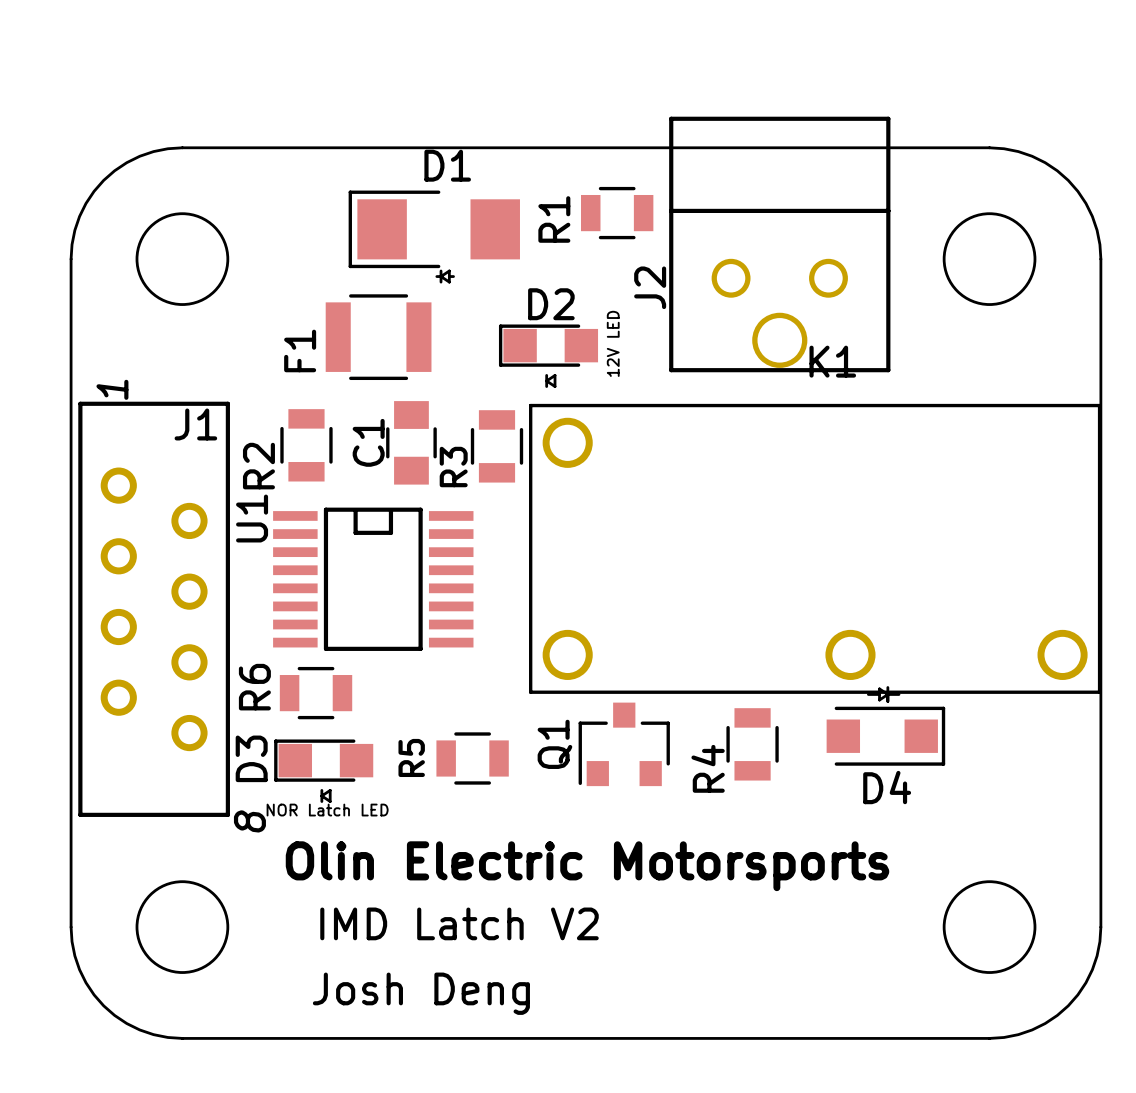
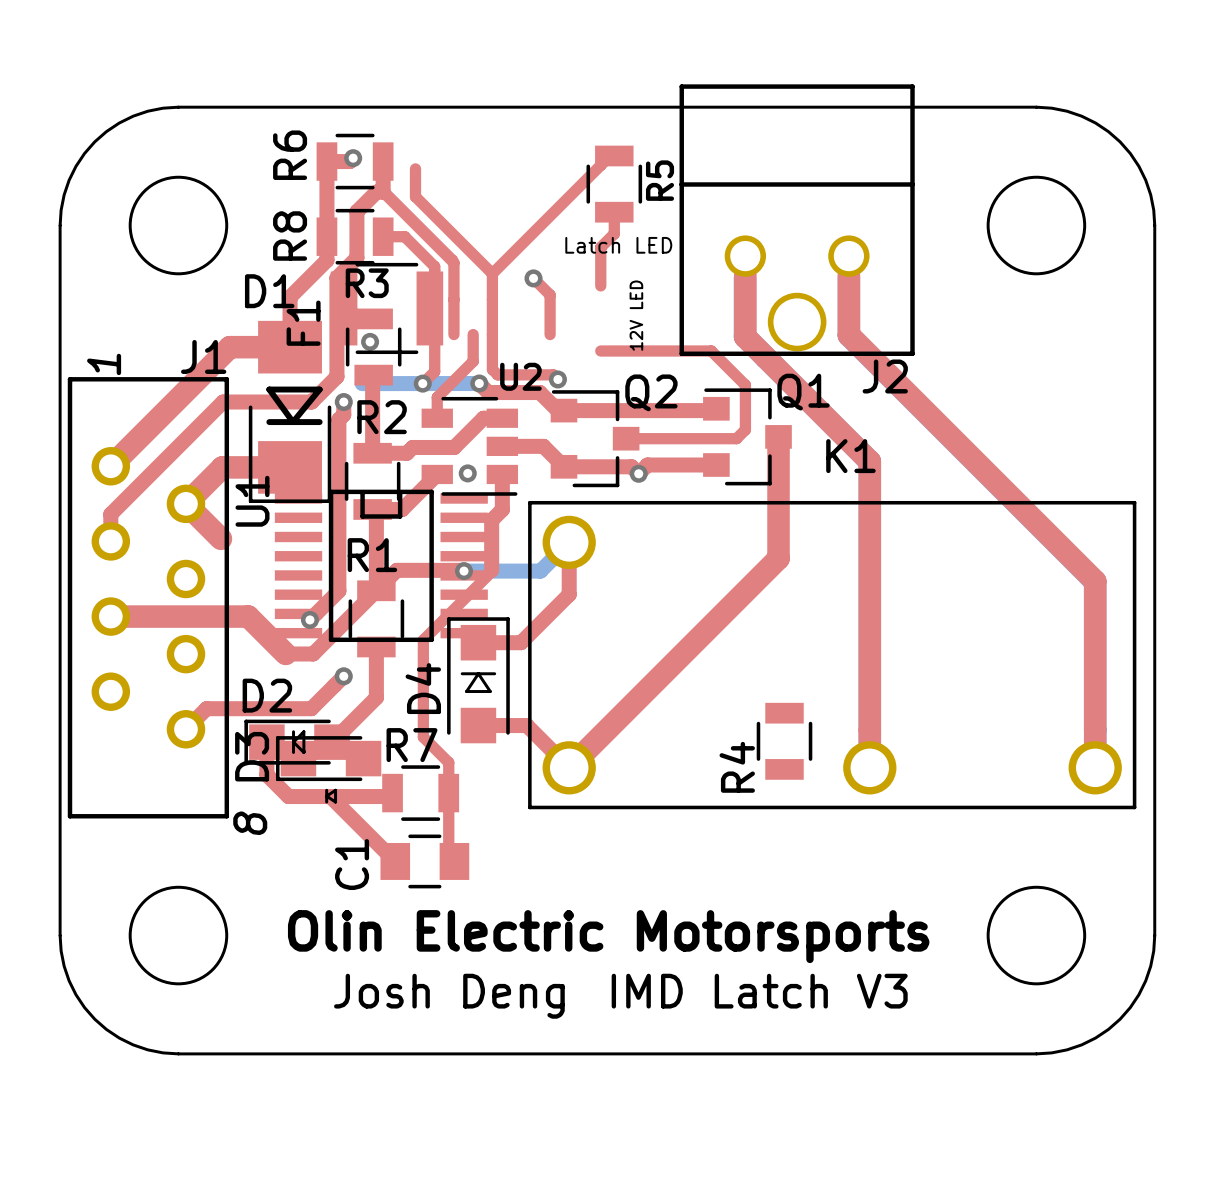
D1 footprint: [348, 190, 520, 284] -> [248, 320, 332, 503]
top track: none -> (612, 153) (492, 273)
top track: none -> (353, 158) (349, 161) (326, 161) (326, 260) (290, 297) (290, 347)
via: none -> (353, 158)
top track: none -> (415, 168) (415, 196) (492, 273)
R1 rotation: 0° (617, 213) -> 90° clockwise (376, 618)
R1 position: (617, 213) -> (376, 618)
top track: none -> (383, 192) (376, 192) (356, 211) (356, 257) (336, 277) (336, 376) (311, 402) (223, 402) (110, 514) (110, 541)
top track: none -> (383, 192) (383, 161) (383, 188) (453, 259) (453, 334) (453, 262) (383, 192)
J2 position: (779, 244) -> (797, 220)
top track: none -> (614, 212) (614, 233) (600, 247) (601, 285)
R8: none -> (355, 236)
top track: none -> (383, 236) (404, 236) (434, 266) (434, 371) (422, 383)
text: none -> Latch LED (618, 245)
J2 name rotation: 0° (650, 287) -> 90° clockwise (885, 376)
J2 name position: J2 (650, 287) -> J2 (885, 376)
top track: none -> (745, 256) (745, 337) (869, 461) (869, 767)
top track: none -> (848, 256) (848, 334) (1095, 581) (1095, 767)
top track: none -> (492, 273) (492, 369) (497, 374) (553, 374) (557, 379)
top track: none -> (533, 278) (550, 294) (550, 334)
via: none -> (533, 278)
D2 footprint: [498, 324, 599, 388] -> [244, 719, 350, 765]
top track: none -> (473, 334) (473, 361) (437, 397) (437, 418)
via: none -> (370, 341)
top track: none -> (290, 347) (229, 347) (110, 466)
top track: none -> (600, 351) (711, 351) (745, 385) (745, 429) (736, 438) (626, 438)
top track: none -> (373, 375) (372, 453) (406, 453) (412, 447) (454, 447) (483, 418) (502, 418)
via: none -> (557, 379)
bottom track: none -> (362, 383) (479, 383)
via: none -> (422, 383)
top track: none -> (479, 383) (488, 392) (539, 392) (557, 410) (714, 410) (716, 408)
via: none -> (479, 383)
J1 name position: J1 (195, 424) -> J1 (203, 356)
top track: none -> (343, 402) (343, 414) (338, 419) (338, 591) (309, 619)
via: none -> (343, 402)
C1 rotation: 0° (411, 442) -> 90° clockwise (424, 861)
C1 position: (411, 442) -> (424, 861)
R2 position: (306, 445) -> (372, 481)
R3 position: (497, 446) -> (373, 347)
top track: none -> (778, 436) (778, 558) (569, 767) (526, 725) (478, 725)
Q2: none -> (595, 438)
R2 name rotation: 0° (258, 466) -> 90° clockwise (382, 417)
R2 name position: R2 (258, 466) -> R2 (382, 417)
U2: none -> (469, 446)
top track: none -> (502, 446) (543, 446) (564, 466) (631, 466) (638, 473) (647, 464) (716, 464)
R3 name rotation: 0° (453, 467) -> 90° clockwise (367, 283)
R3 name position: R3 (453, 467) -> R3 (367, 283)
top track: none -> (290, 467) (222, 467) (185, 503) (220, 538)
via: none -> (467, 473)
via: none -> (638, 473)
top track: none -> (437, 474) (402, 509) (372, 509) (376, 513) (376, 590)
top track: none -> (502, 474) (502, 509) (491, 520) (491, 571) (423, 640) (423, 737) (448, 762) (448, 855) (454, 861)
K1 position: (815, 548) -> (832, 655)
top track: none -> (569, 542) (569, 594) (521, 642) (478, 642)
bottom track: none -> (569, 542) (540, 571) (464, 571)
top track: none -> (464, 571) (396, 570) (313, 653) (285, 653) (248, 616) (110, 616)
via: none -> (464, 571)
via: none -> (309, 619)
top track: none -> (376, 647) (376, 697) (331, 742)
top track: none -> (343, 676) (311, 708) (206, 708) (185, 729)
via: none -> (343, 676)
D4 footprint: [826, 686, 946, 766] -> [447, 617, 510, 744]
R6 position: (316, 693) -> (355, 161)
Q1 name position: Q1 (554, 744) -> Q1 (803, 392)
Q1 rotation: 0° (624, 744) -> 90° clockwise (747, 436)
Q1 position: (624, 744) -> (747, 436)
top track: none -> (266, 742) (266, 774) (288, 796) (389, 796) (392, 793)
R5 name position: R5 (411, 757) -> R5 (660, 180)
R5 rotation: 0° (472, 758) -> 90° clockwise (614, 184)
R5 position: (472, 758) -> (614, 184)
D4 name position: D4 (887, 787) -> D4 (423, 688)
R7: none -> (420, 793)
top track: none -> (330, 796) (395, 861)
text: NOR Latch LED (327, 810) -> none
text position: Olin Electric Motorsports (587, 866) -> Olin Electric Motorsports (608, 936)
text: IMD Latch V2 (459, 923) -> IMD Latch V3 (759, 991)
text position: Josh Deng (421, 993) -> Josh Deng (449, 996)

